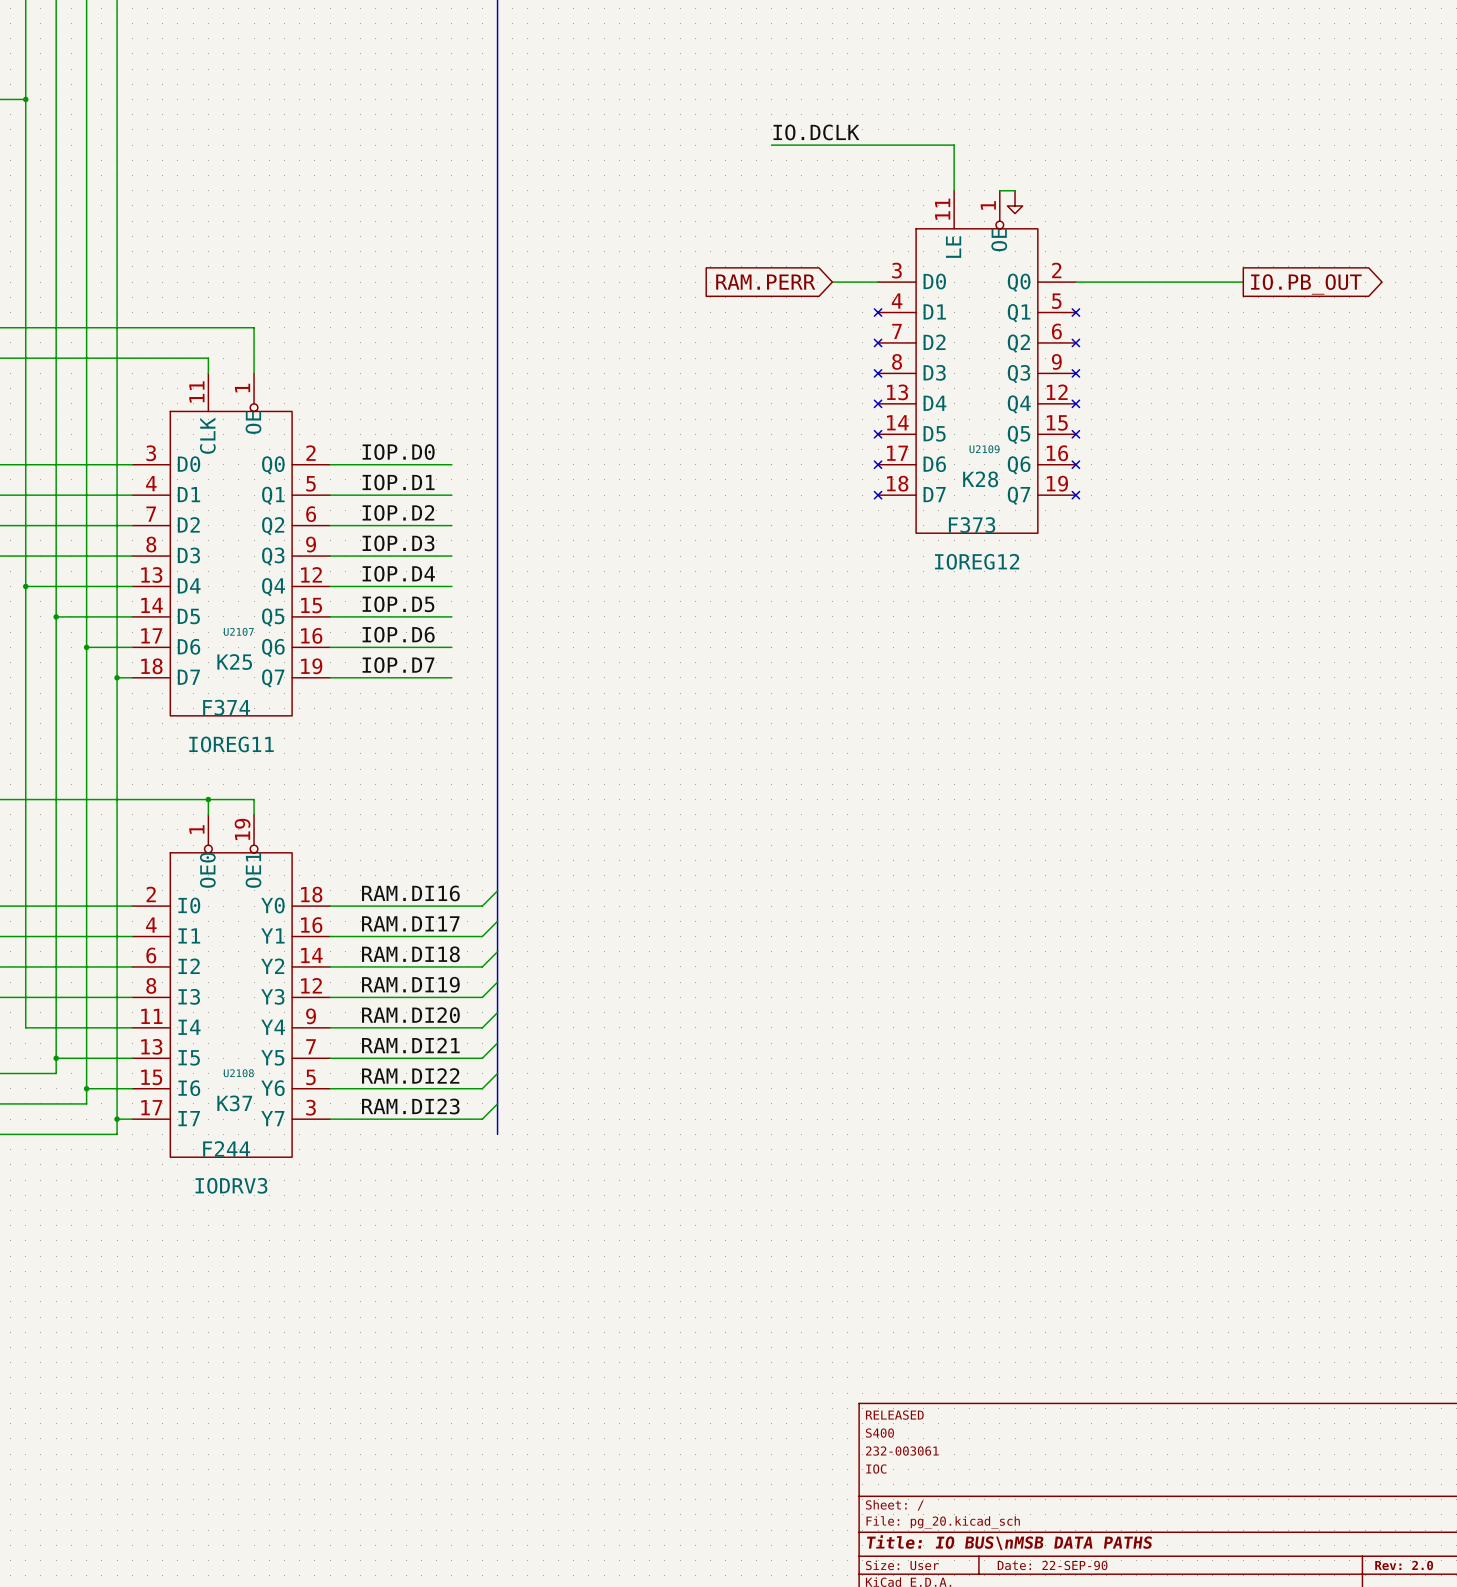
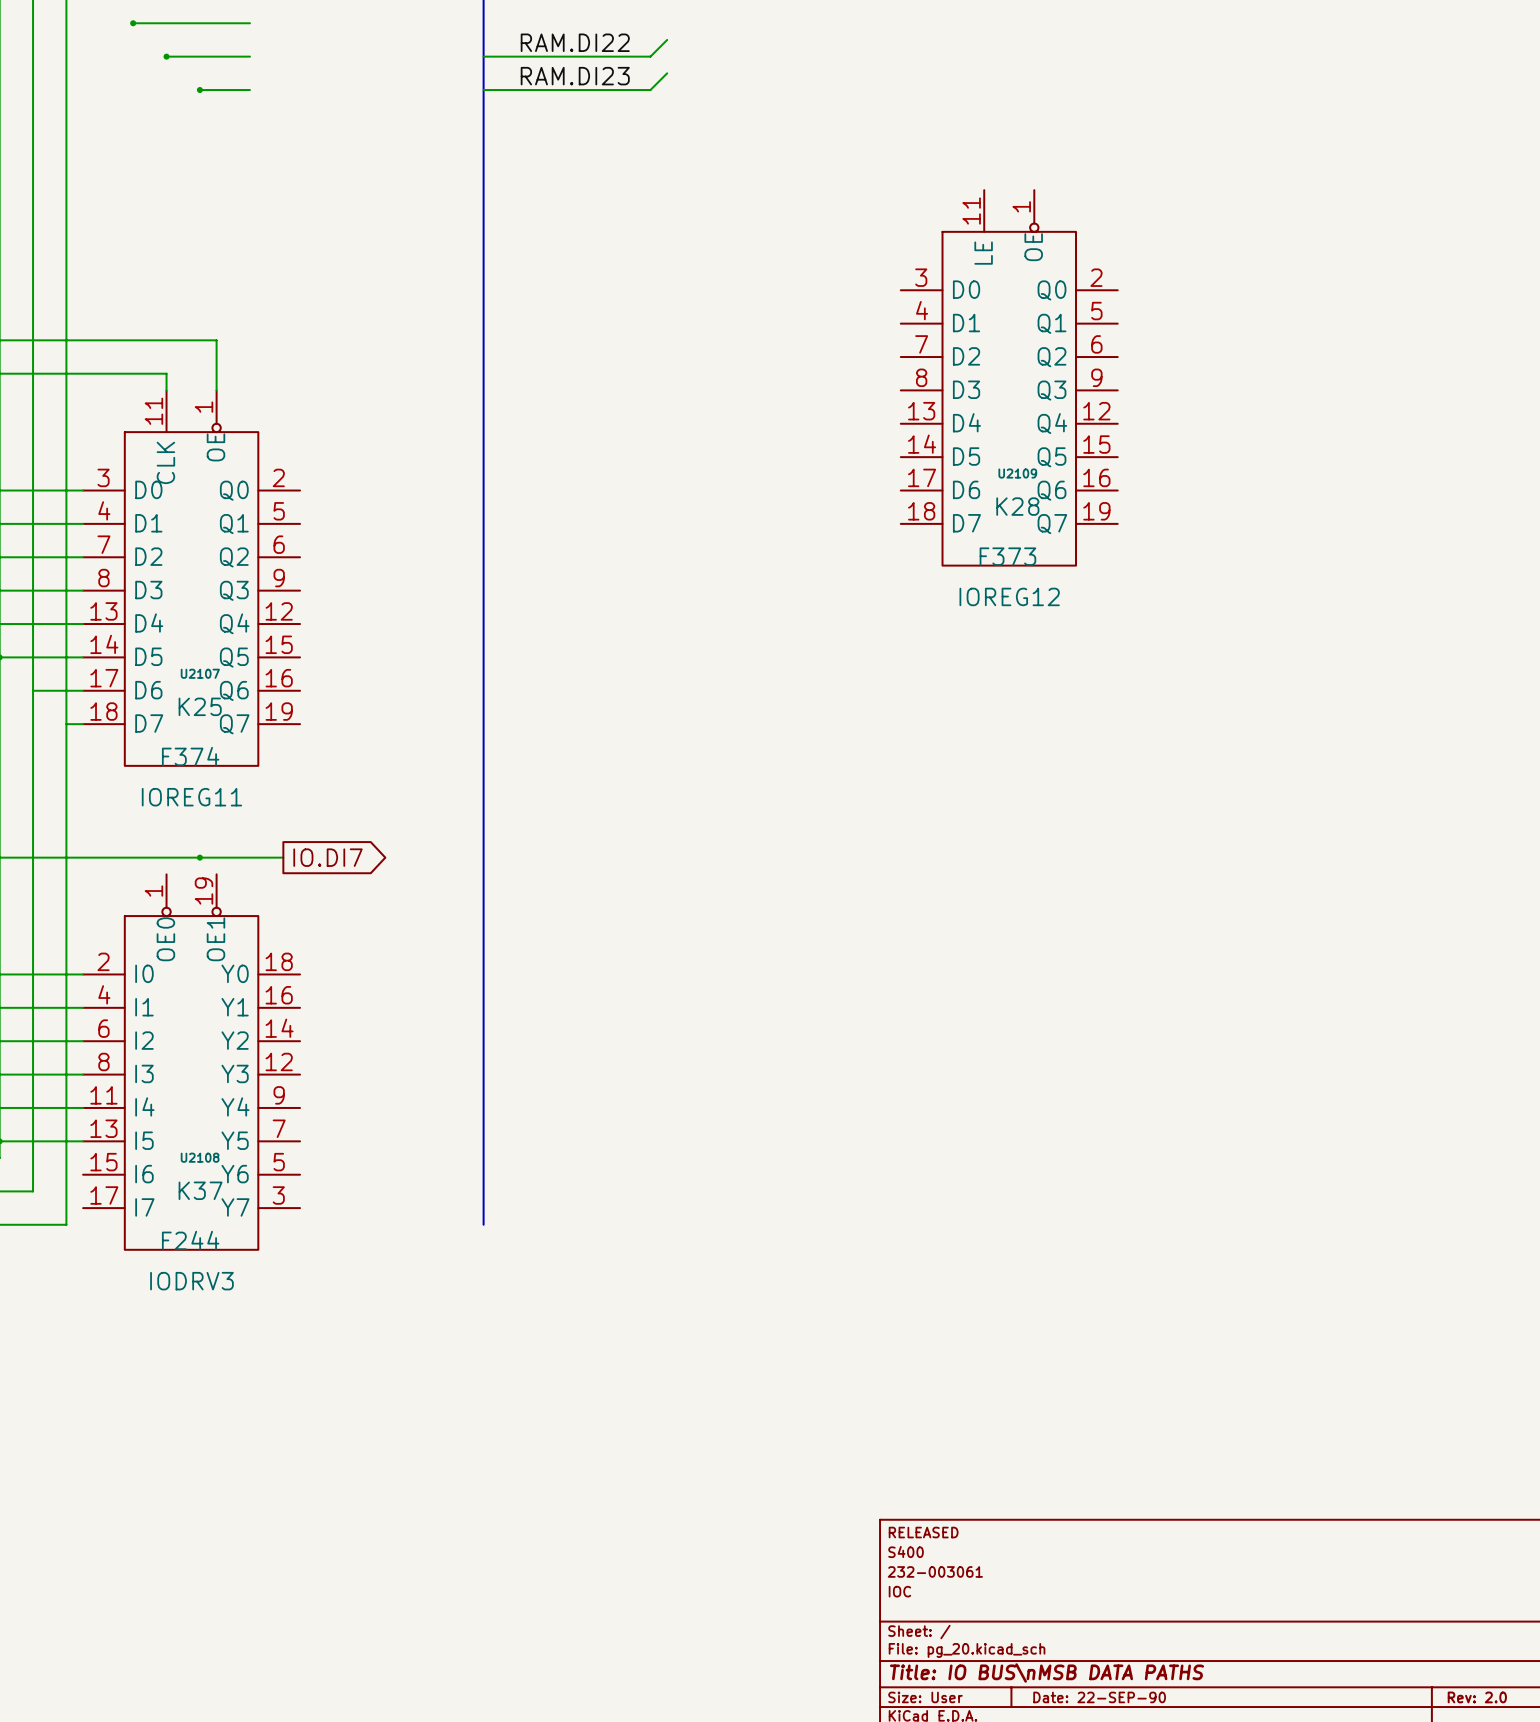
wire: none -> (133, 23) (249, 23)
junction: none -> (133, 23)
wire: none -> (667, 39) (650, 56) (483, 56)
label: none -> RAM.DI22 (575, 42)
wire: none -> (166, 56) (249, 56)
junction: none -> (166, 56)
wire: none -> (667, 73) (650, 90) (483, 90)
label: none -> RAM.DI23 (575, 76)
wire: none -> (199, 90) (249, 90)
junction: none -> (199, 90)
label: IO.DCLK (816, 132) -> none
wire: (771, 145) (954, 145) (954, 190) -> none
wire: (999, 190) (1015, 190) -> none
power symbol: (1015, 202) -> none
global label: RAM.PERR (765, 282) -> none
wire: (832, 282) (878, 282) -> none
wire: (1075, 282) (1243, 282) -> none
global label: IO.PB_OUT (1306, 284) -> none
no-connect mark: (878, 312) -> none
no-connect mark: (1075, 312) -> none
no-connect mark: (878, 342) -> none
no-connect mark: (1075, 342) -> none
no-connect mark: (878, 373) -> none
no-connect mark: (1075, 373) -> none
no-connect mark: (878, 403) -> none
no-connect mark: (1075, 403) -> none
no-connect mark: (878, 434) -> none
no-connect mark: (1075, 434) -> none
label: IOP.D0 (398, 452) -> none
wire: (330, 464) (451, 464) -> none
no-connect mark: (878, 464) -> none
no-connect mark: (1075, 464) -> none
label: IOP.D1 (398, 482) -> none
wire: (330, 495) (451, 495) -> none
no-connect mark: (878, 495) -> none
no-connect mark: (1075, 495) -> none
label: IOP.D2 (398, 512) -> none
wire: (330, 525) (451, 525) -> none
label: IOP.D3 (398, 543) -> none
wire: (330, 556) (451, 556) -> none
label: IOP.D4 (398, 573) -> none
wire: (330, 586) (451, 586) -> none
label: IOP.D5 (398, 604) -> none
wire: (330, 616) (451, 616) -> none
label: IOP.D6 (398, 634) -> none
junction: (86, 647) -> none
wire: (330, 647) (451, 647) -> none
label: IOP.D7 (398, 665) -> none
junction: (117, 677) -> none
wire: (330, 677) (451, 677) -> none
wire: (208, 799) (208, 814) -> none
junction position: (208, 799) -> (199, 857)
wire: (254, 799) (254, 814) -> (216, 857) (283, 857)
global label: none -> IO.DI7 (328, 857)
wire: (497, 890) (482, 906) (330, 906) -> none
label: RAM.DI16 (410, 893) -> none
wire: (497, 921) (482, 936) (330, 936) -> none
label: RAM.DI17 (410, 923) -> none
wire: (497, 951) (482, 966) (330, 966) -> none
label: RAM.DI18 (410, 954) -> none
wire: (497, 982) (482, 997) (330, 997) -> none
label: RAM.DI19 (410, 984) -> none
wire: (497, 1012) (482, 1027) (330, 1027) -> none
label: RAM.DI20 (410, 1015) -> none
wire: (497, 1043) (482, 1058) (330, 1058) -> none
label: RAM.DI21 (410, 1045) -> none
wire: (497, 1073) (482, 1088) (330, 1088) -> none
label: RAM.DI22 (410, 1075) -> none
wire: (86, 1088) (132, 1088) -> none
junction: (86, 1088) -> none
wire: (497, 1103) (482, 1119) (330, 1119) -> none
label: RAM.DI23 (410, 1106) -> none
wire: (117, 1119) (132, 1119) -> none
junction: (117, 1119) -> none

